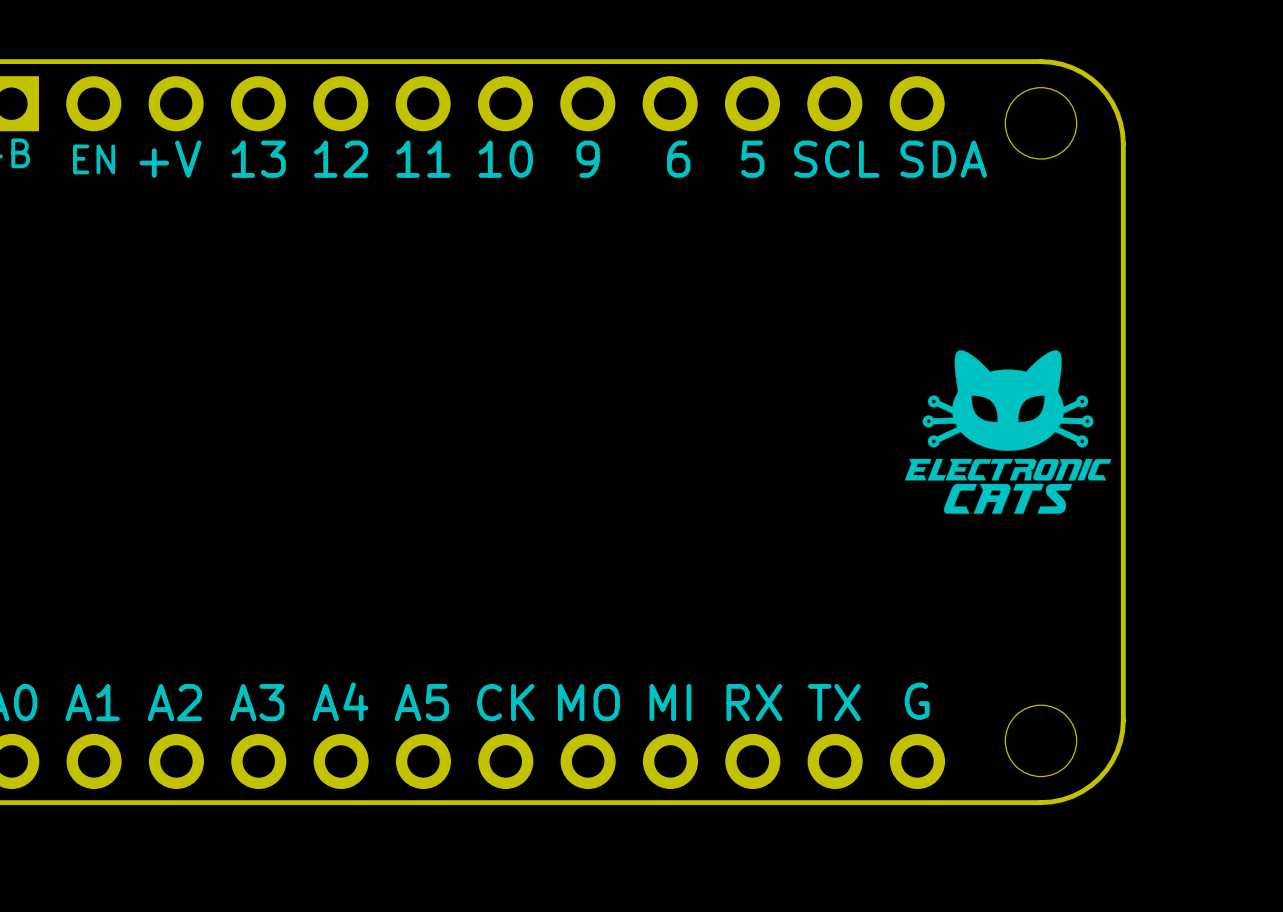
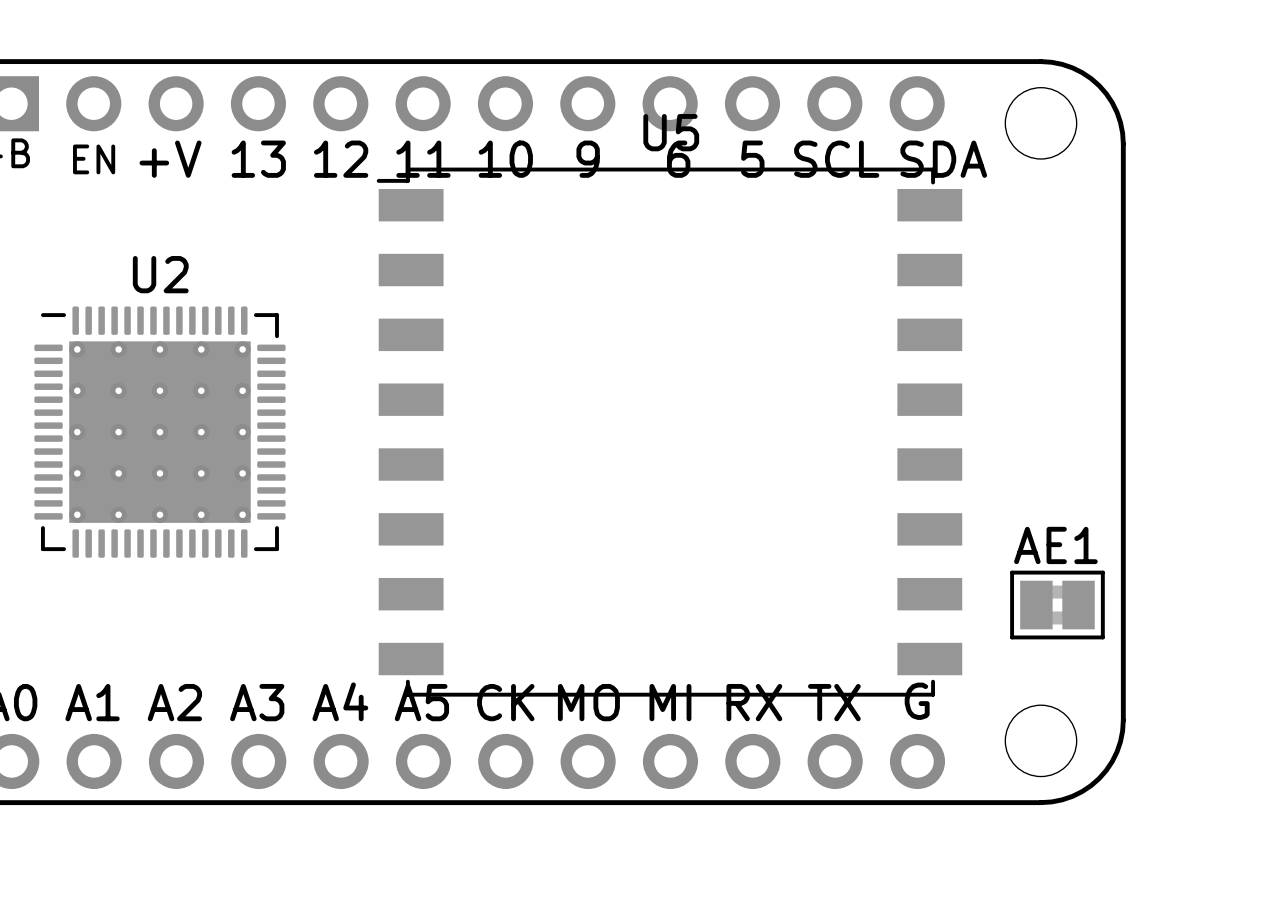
drawing: [904, 350, 1112, 514] -> none
U2: none -> (159, 432)
U5: none -> (669, 432)
AE1: none -> (1057, 605)

